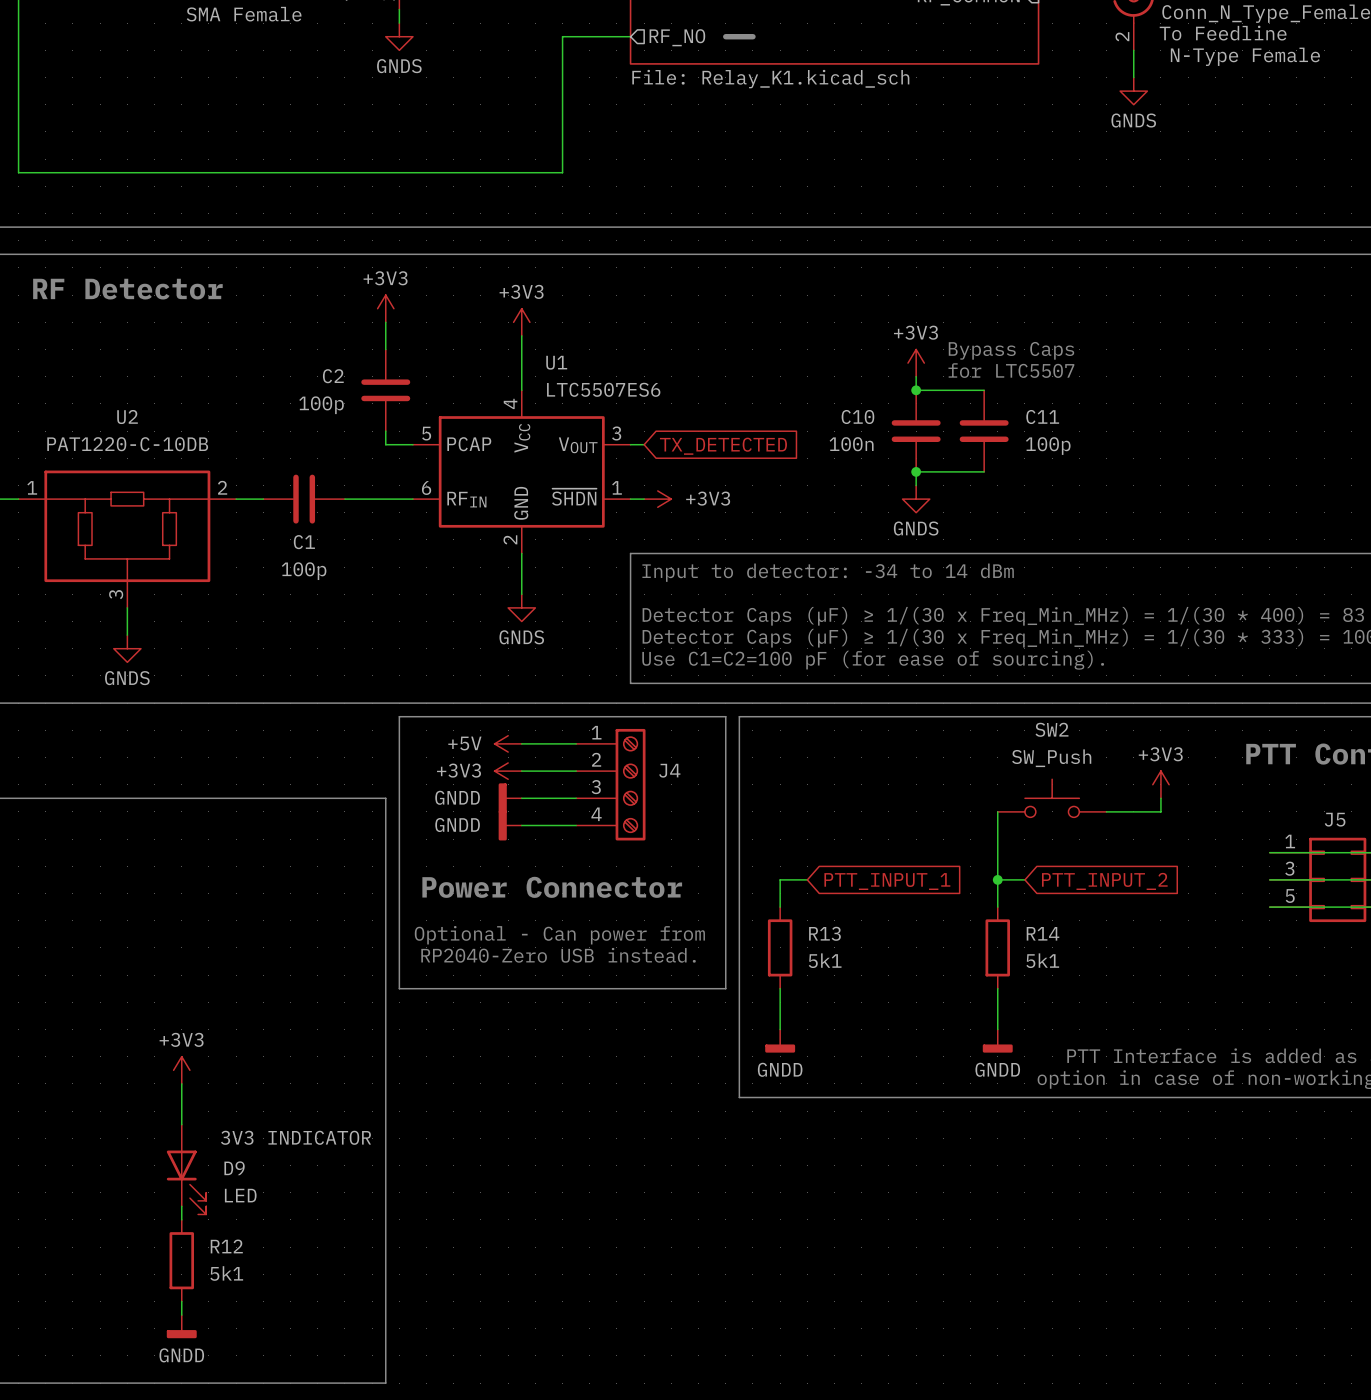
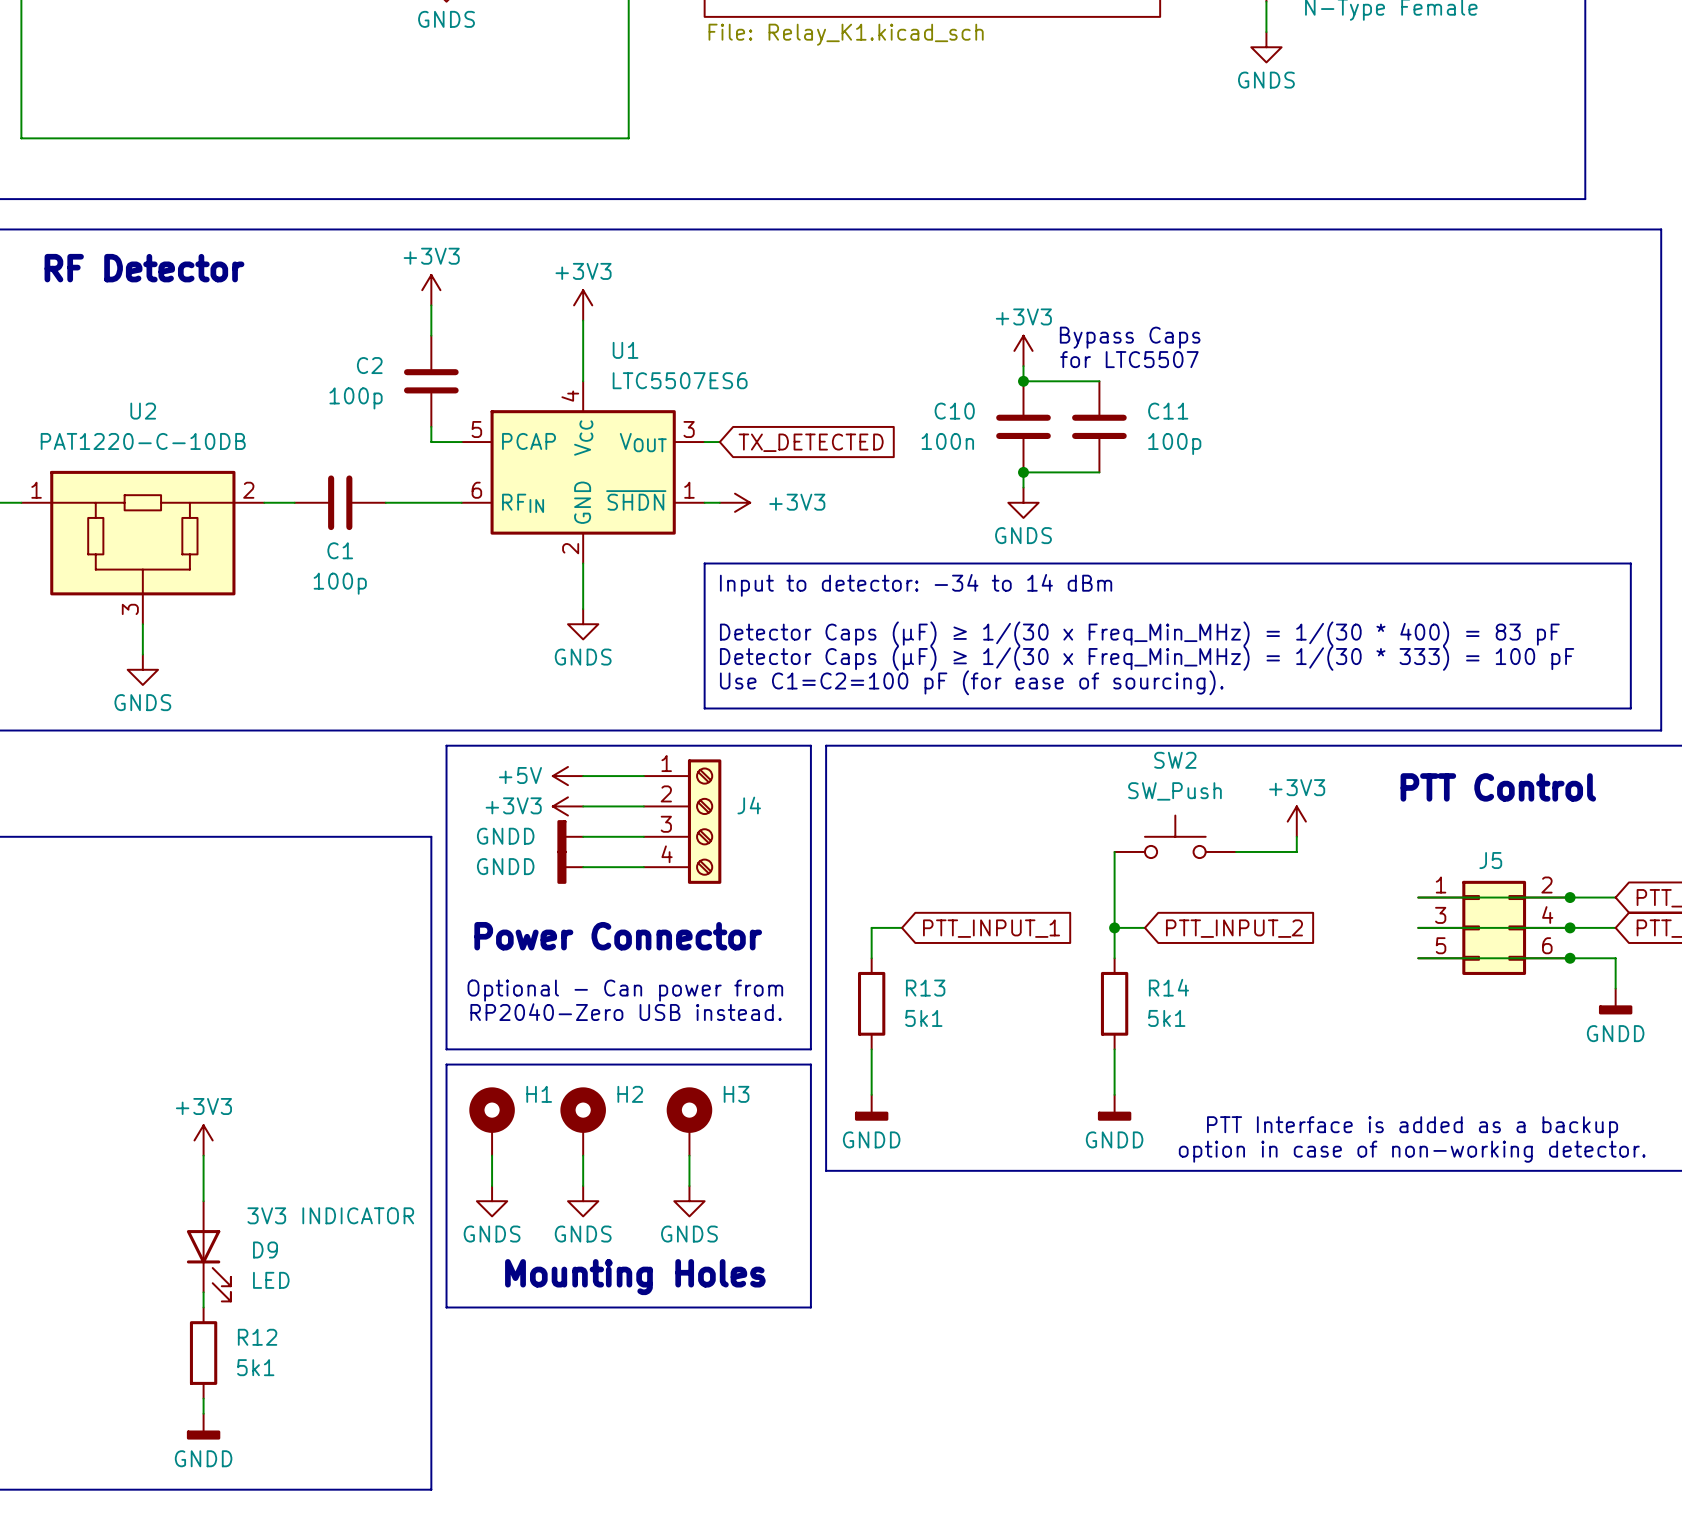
line: none -> (446, 1064) (810, 1064) (810, 1307) (446, 1307) (446, 1064)
H1: none -> (492, 1121)
H2: none -> (583, 1121)
H3: none -> (689, 1121)
wire: none -> (492, 1155) (492, 1186)
wire: none -> (583, 1155) (583, 1186)
wire: none -> (689, 1155) (689, 1186)
power symbol: none -> GNDS (492, 1201)
power symbol: none -> GNDS (583, 1201)
power symbol: none -> GNDS (689, 1201)
text: none -> Mounting Holes (635, 1277)

